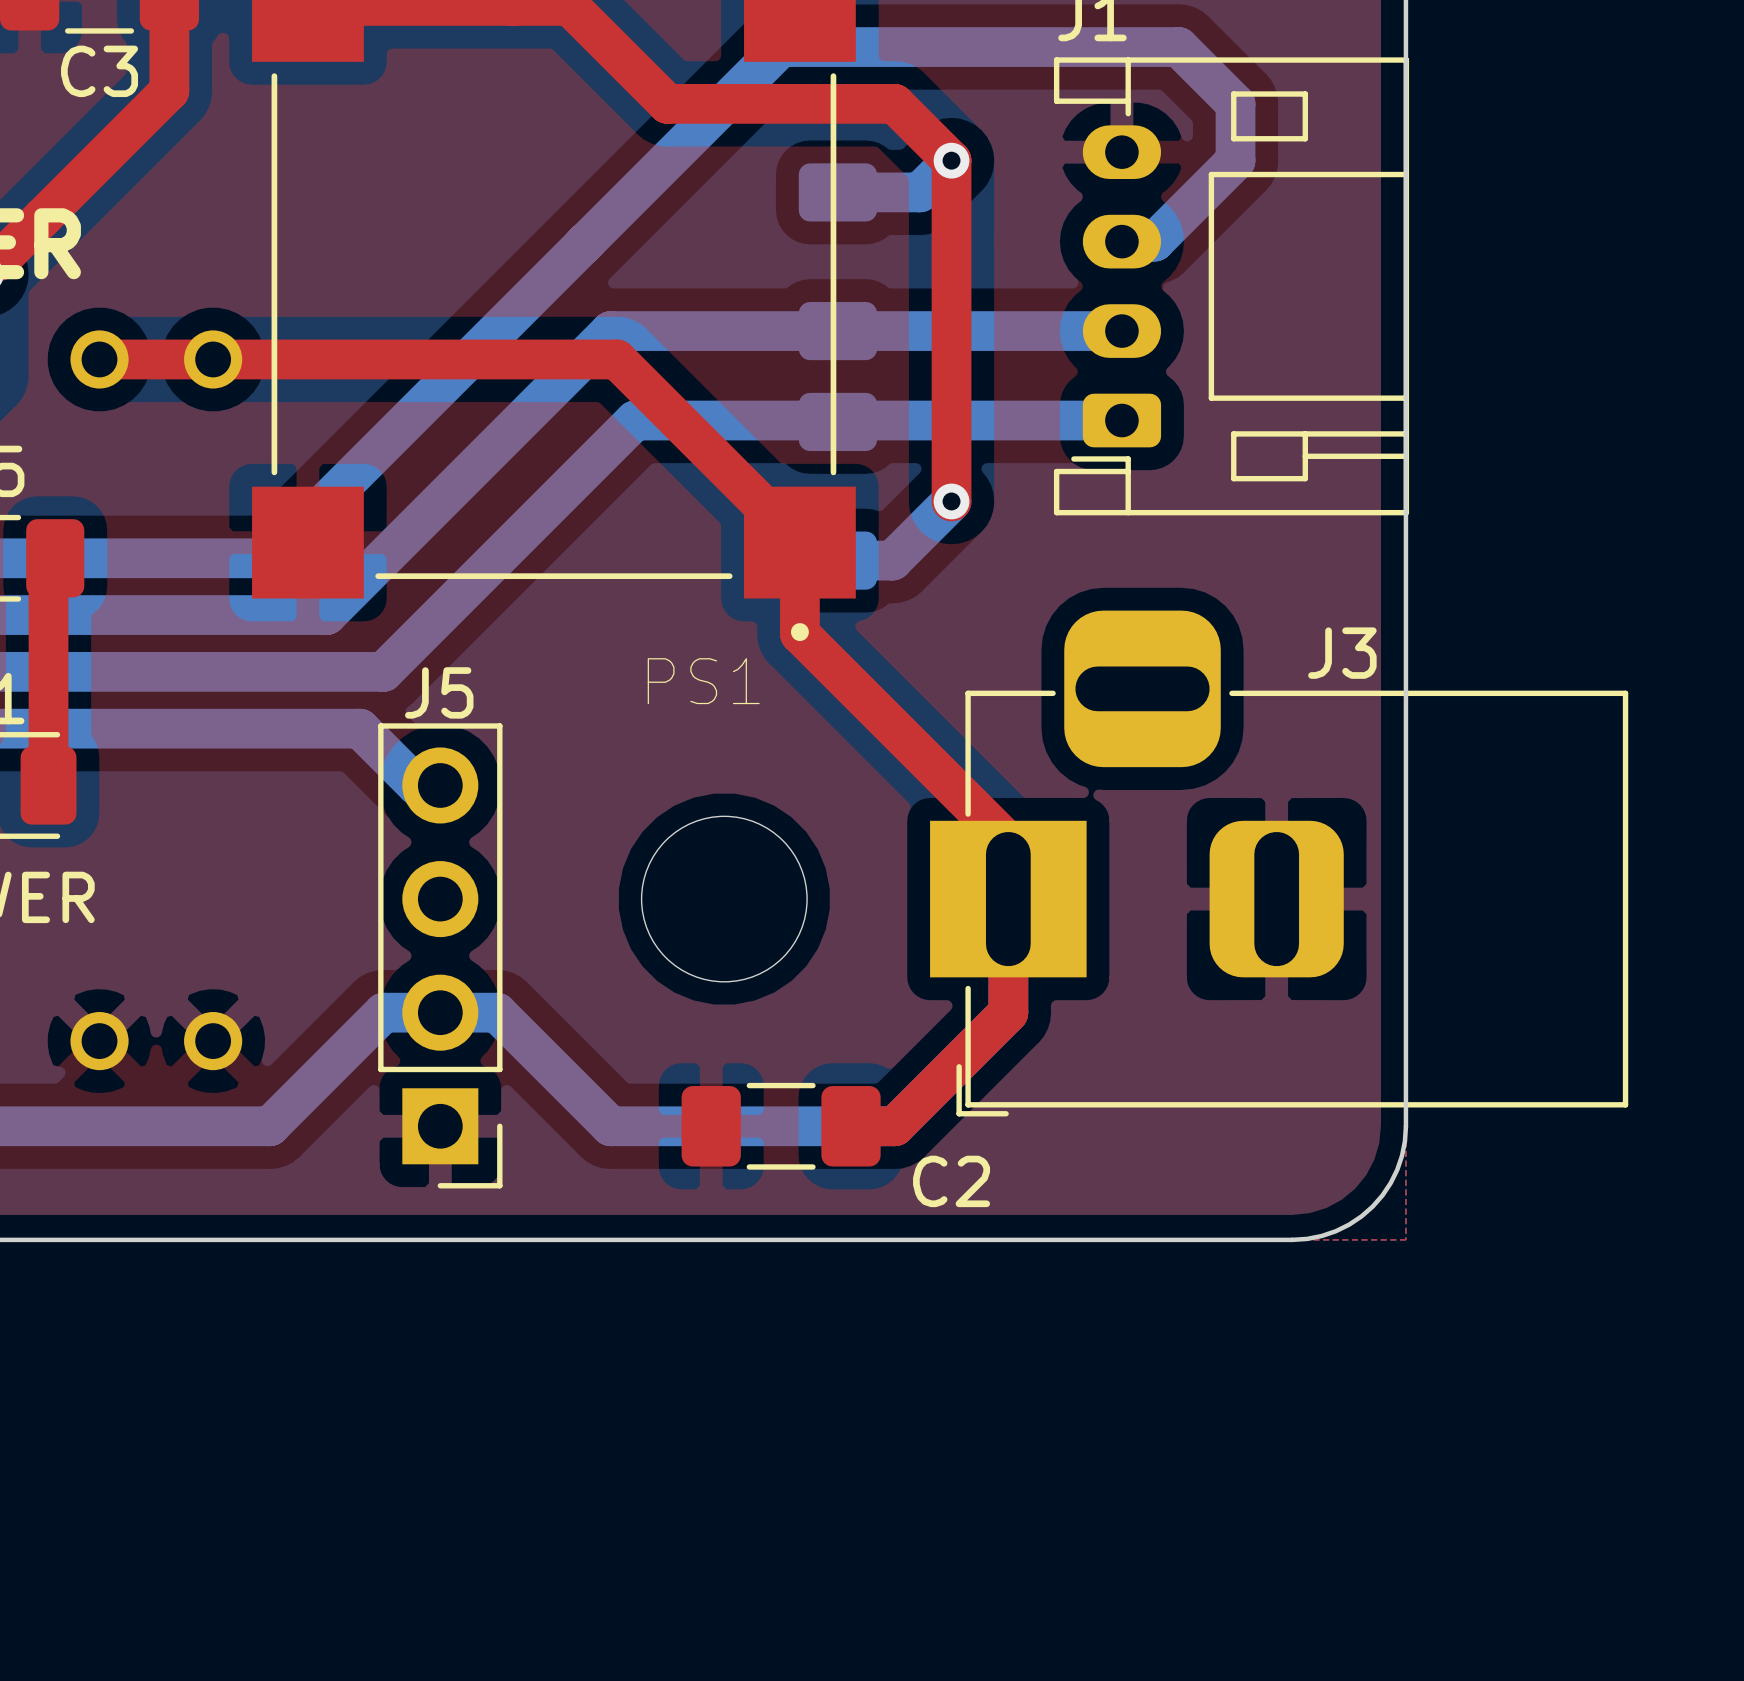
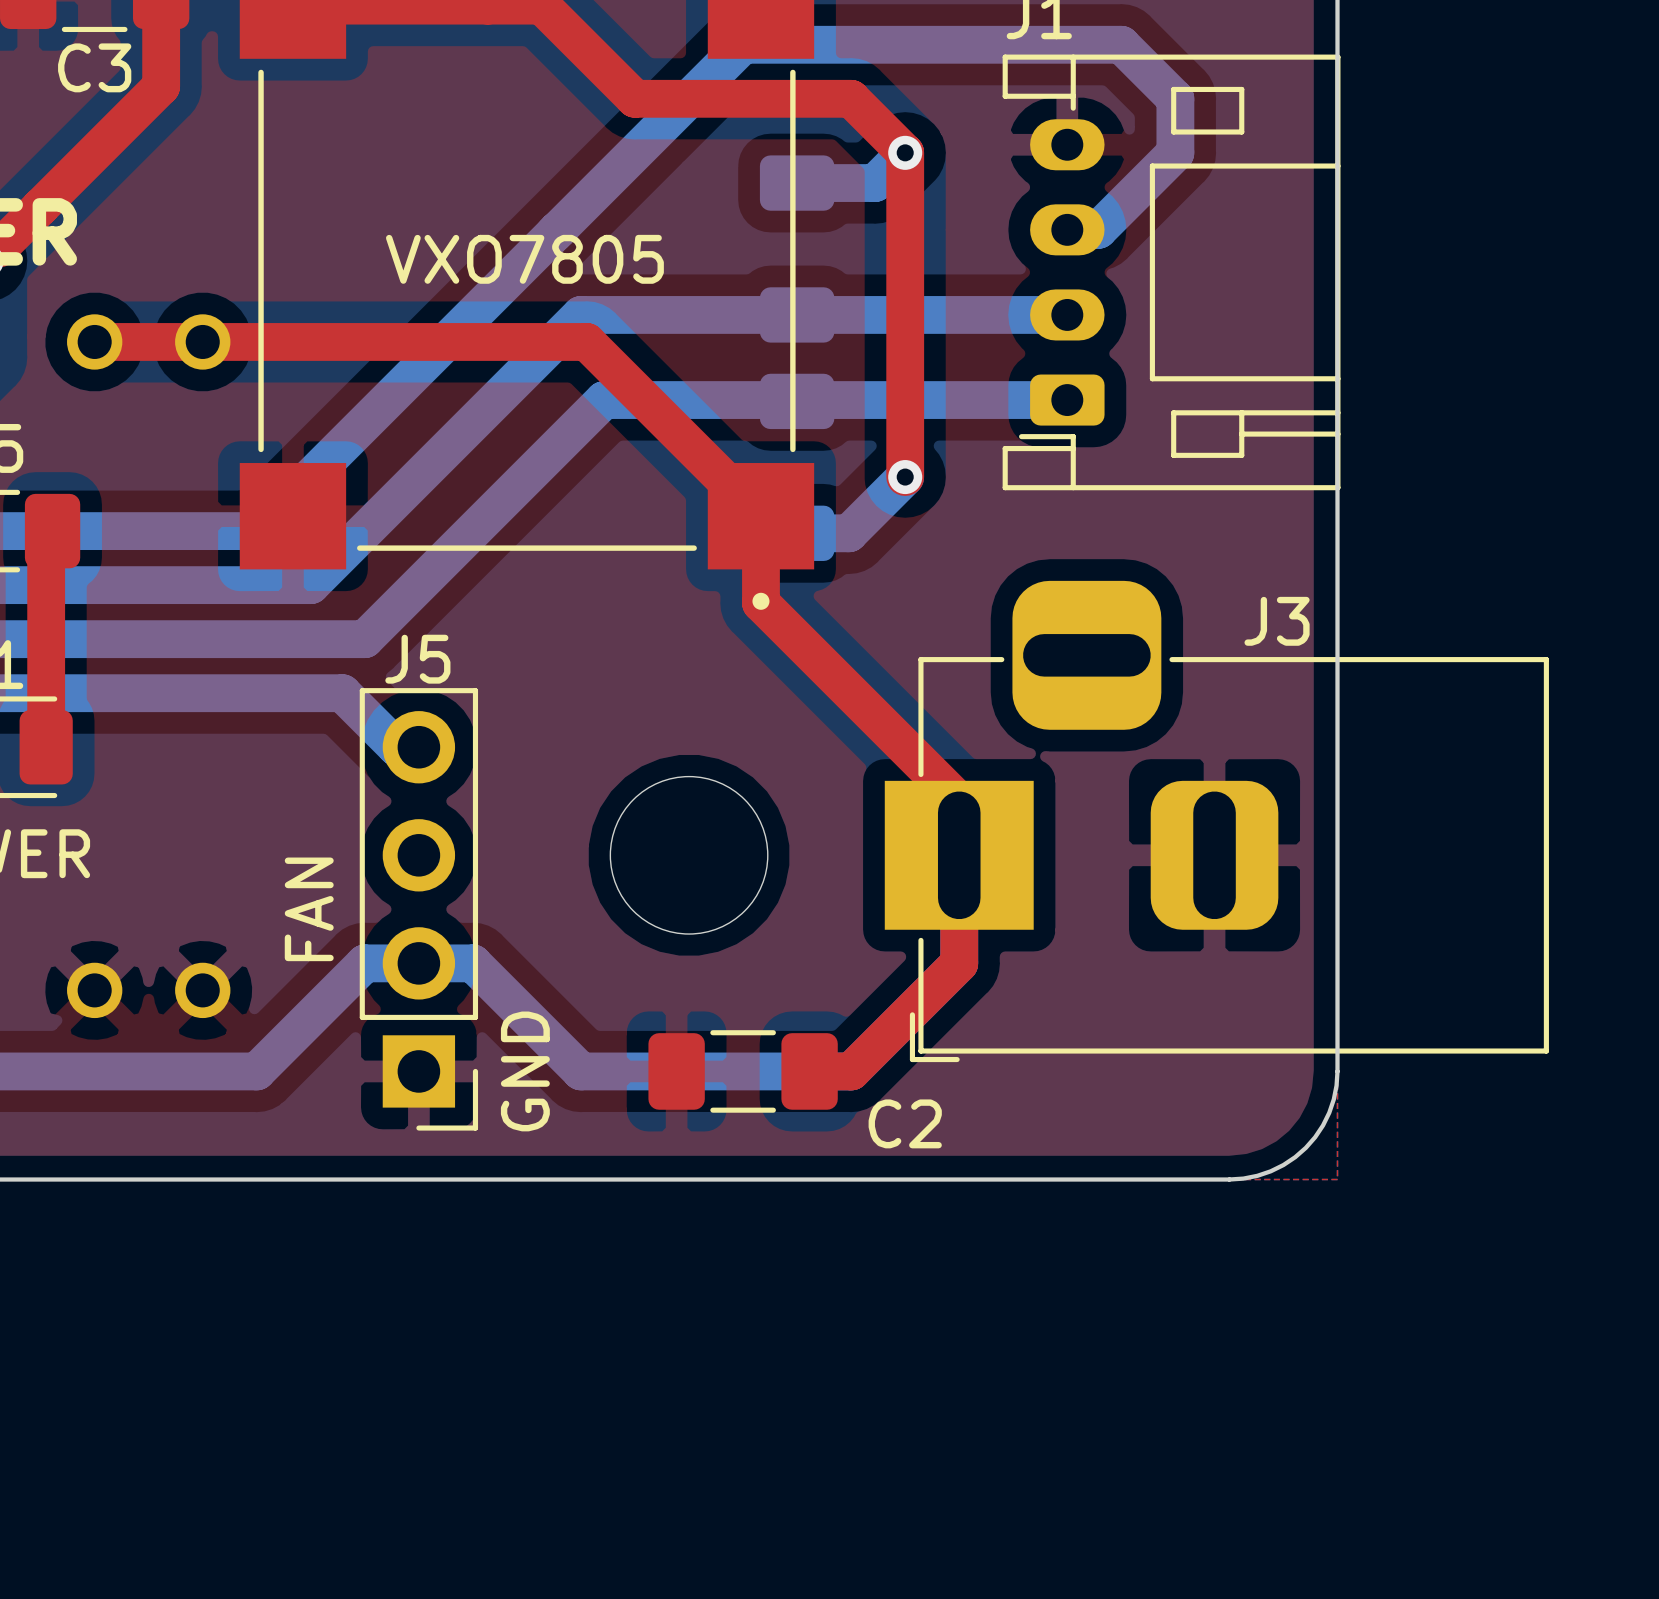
text: none -> VXO7805 (524, 259)
PS1 name: PS1 (703, 681) -> none
text: none -> FAN (309, 909)
text: none -> GND (525, 1071)

